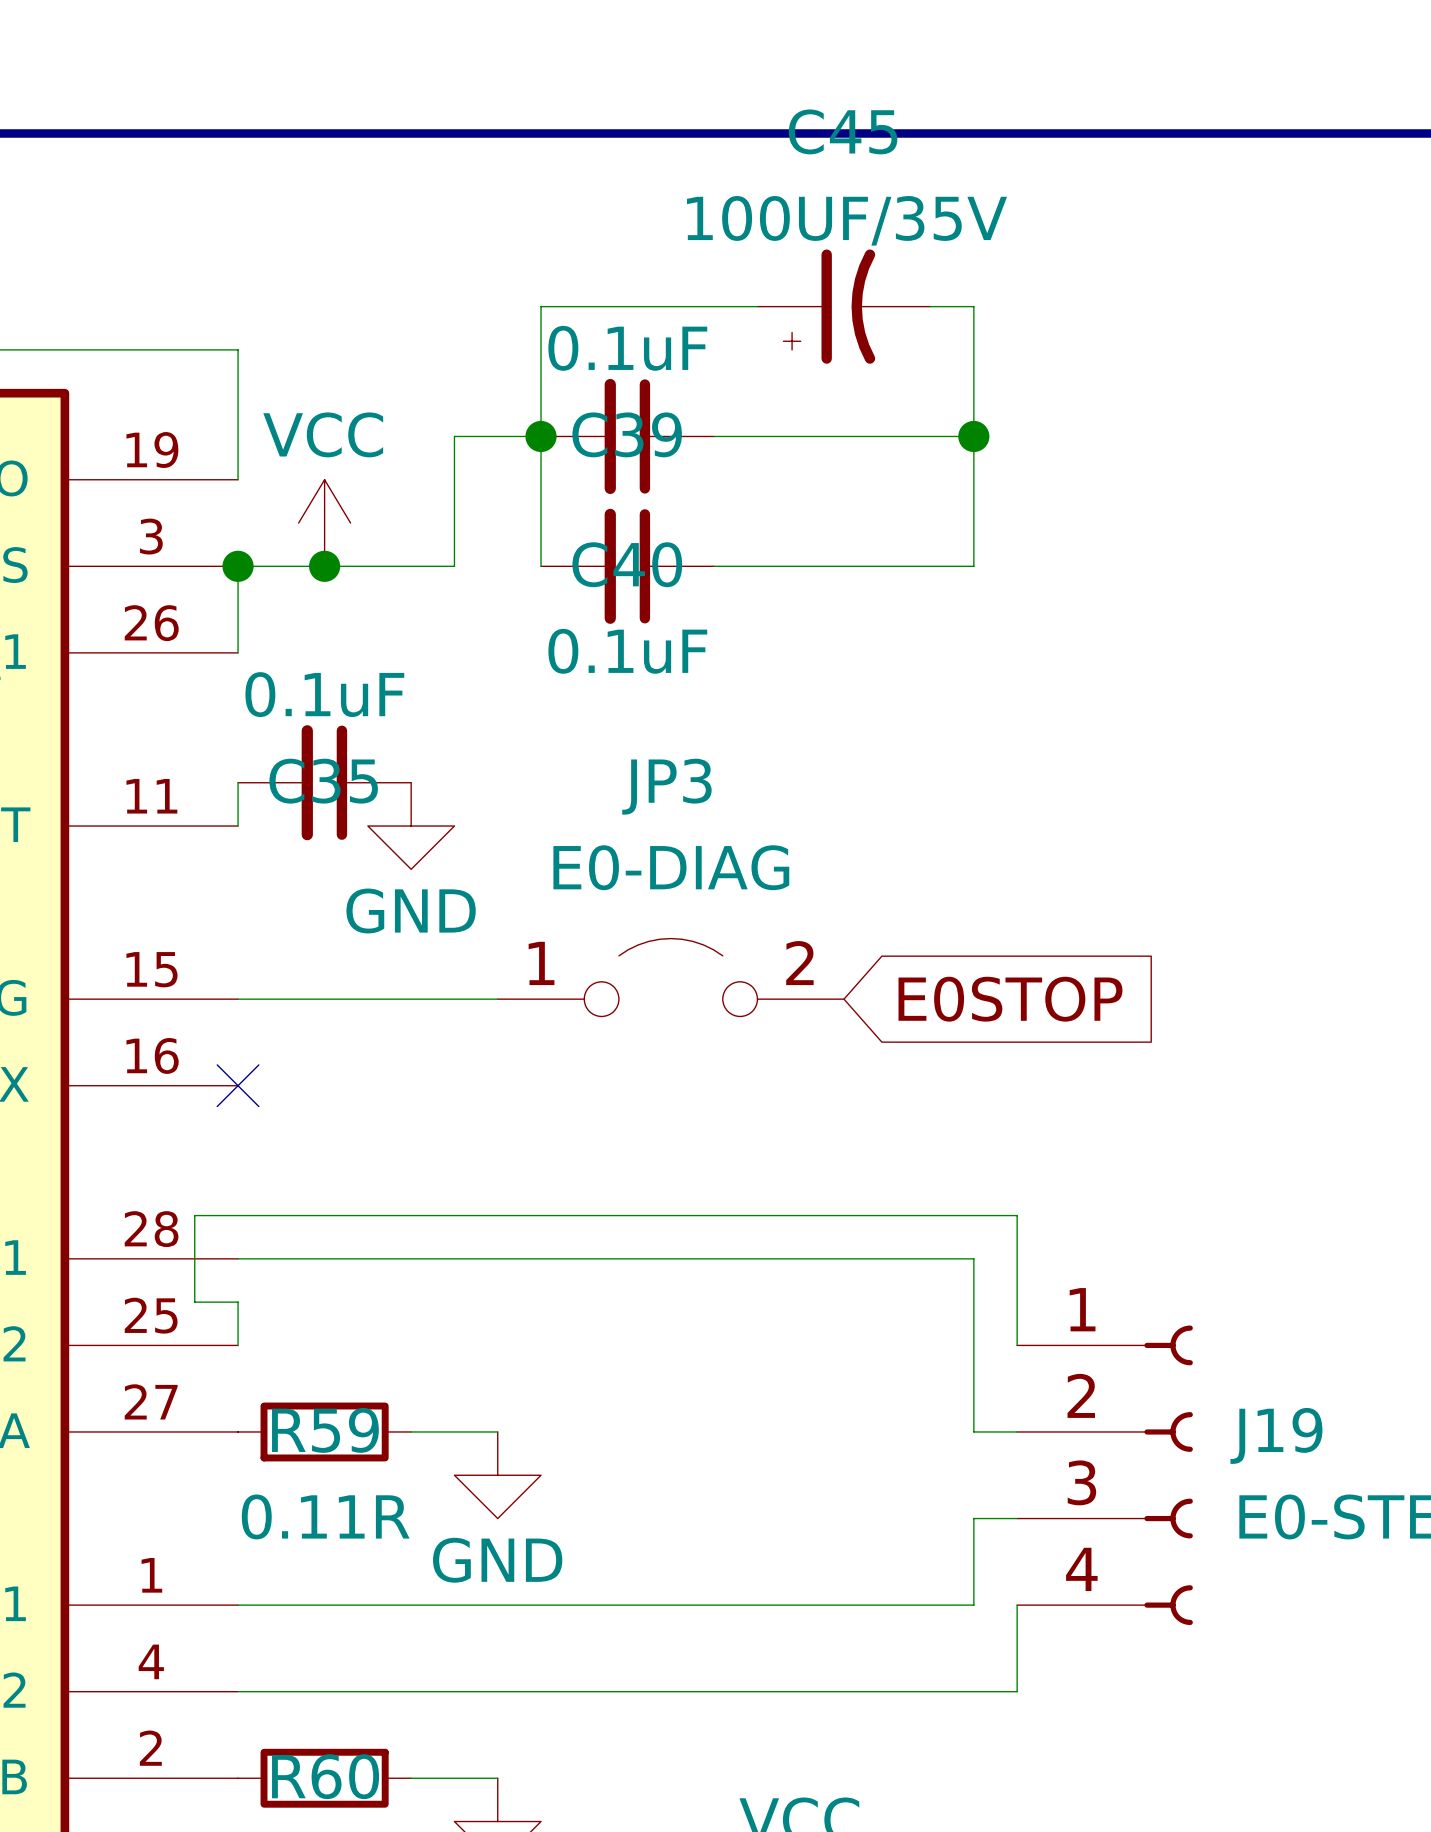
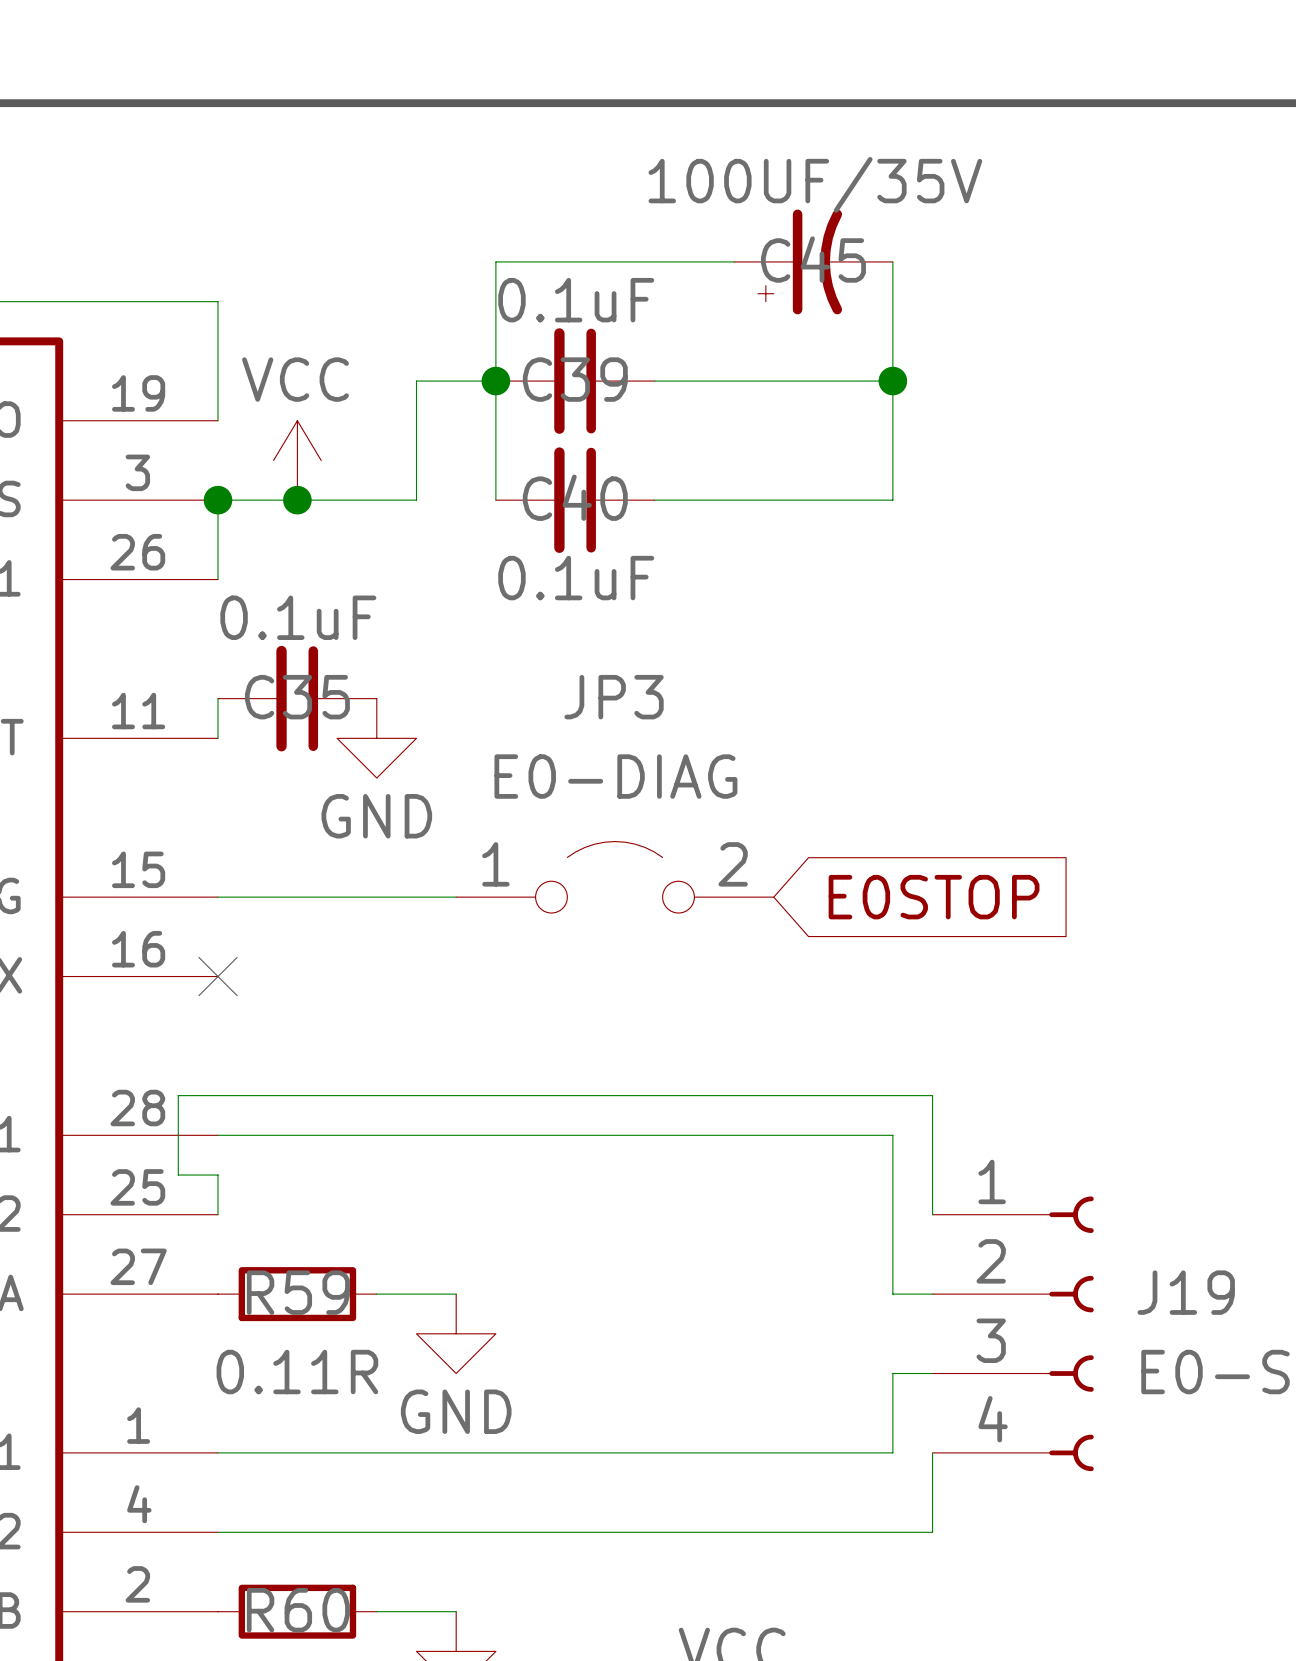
C45 name position: C45 (843, 131) -> C45 (813, 259)
C45 position: (844, 306) -> (813, 261)

